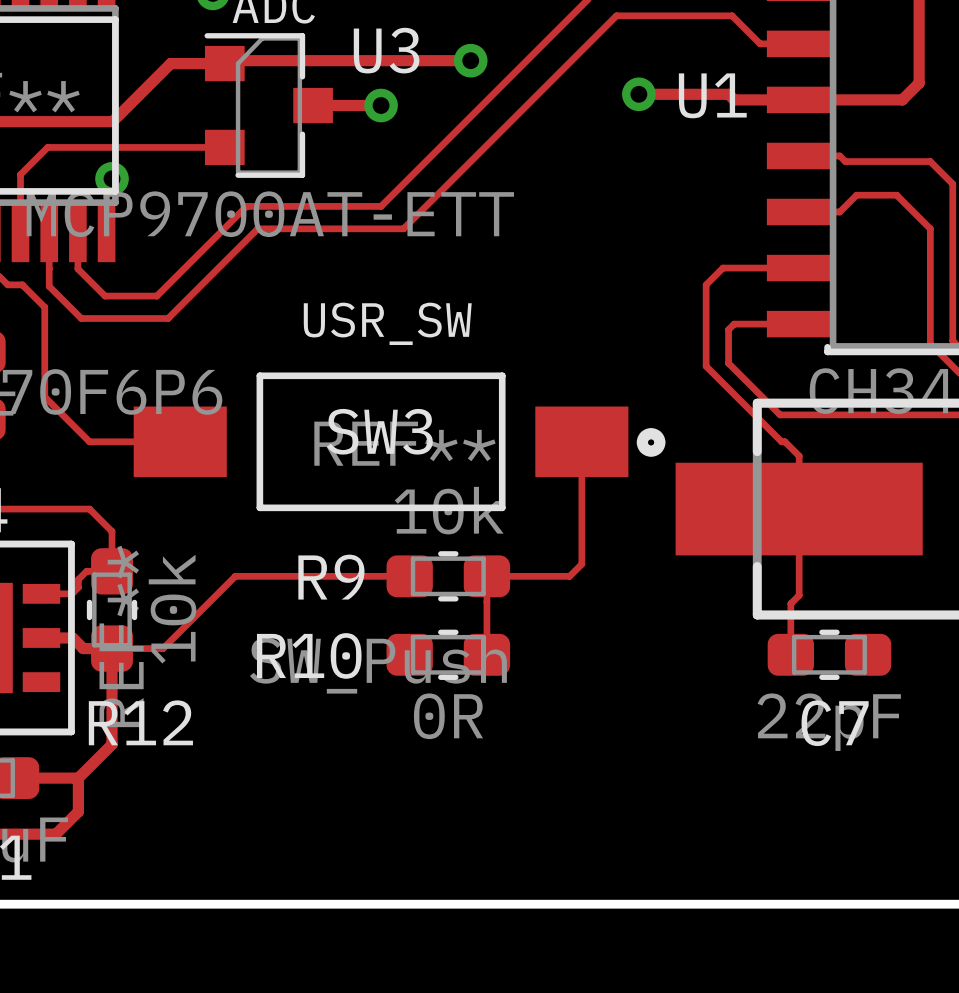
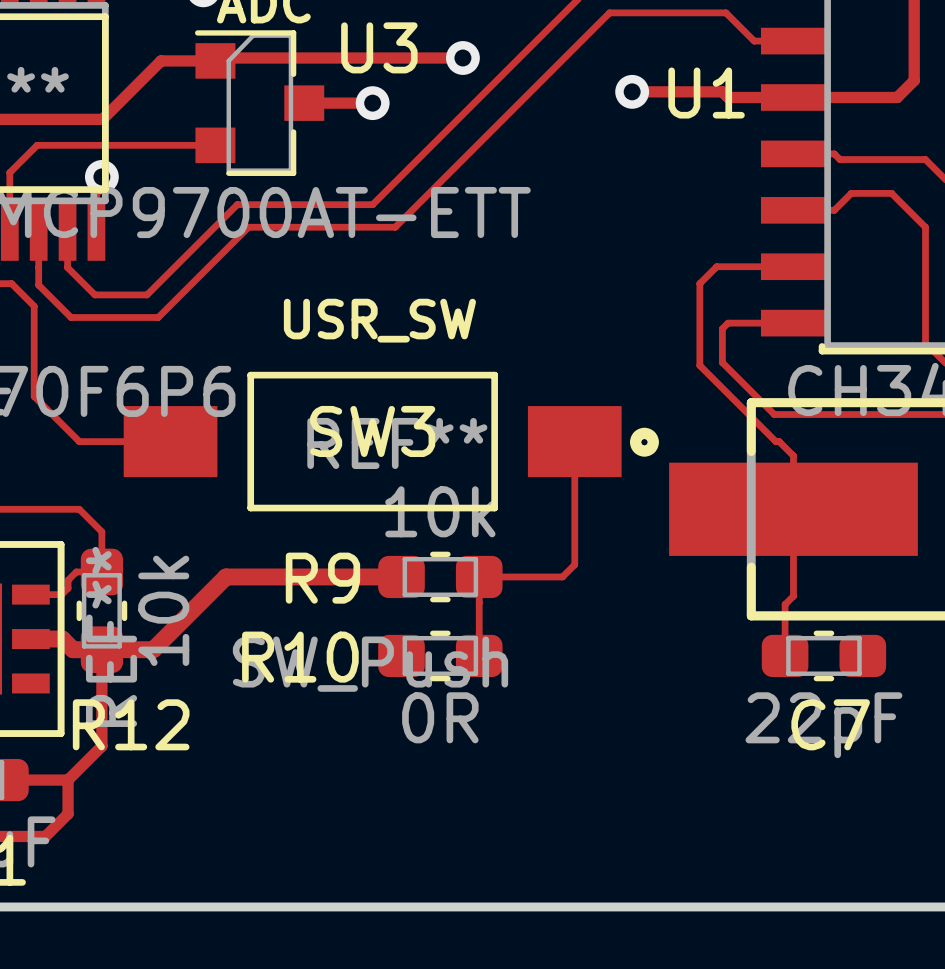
track width: thin (409, 576) (235, 576) (163, 648) (83, 648) (72, 637) (41, 637) (50, 637) -> thick (401, 576) (226, 576) (153, 649) (73, 649) (62, 639) (30, 639) (39, 639)

